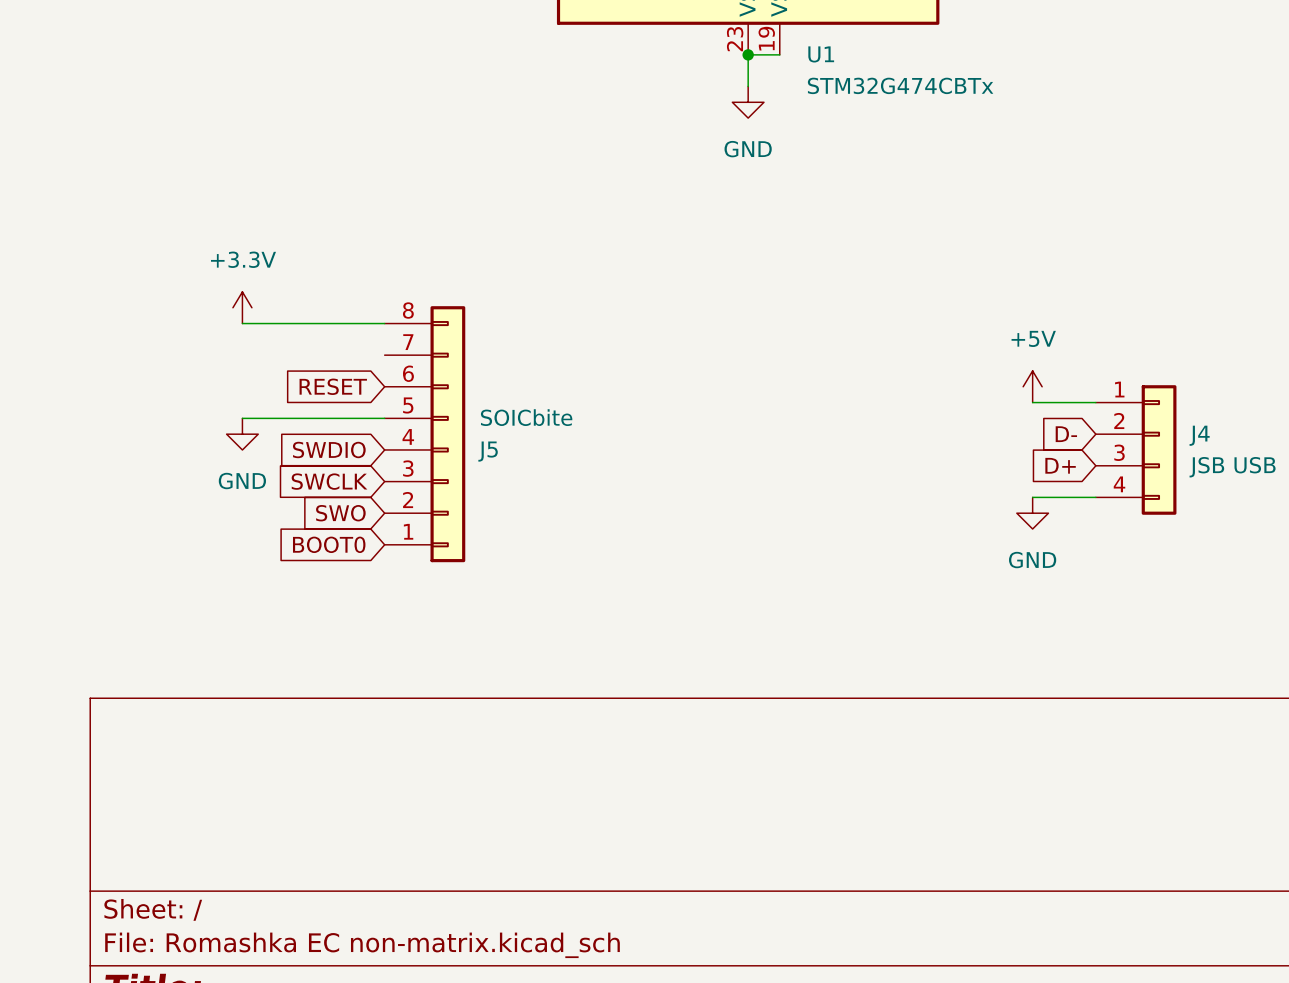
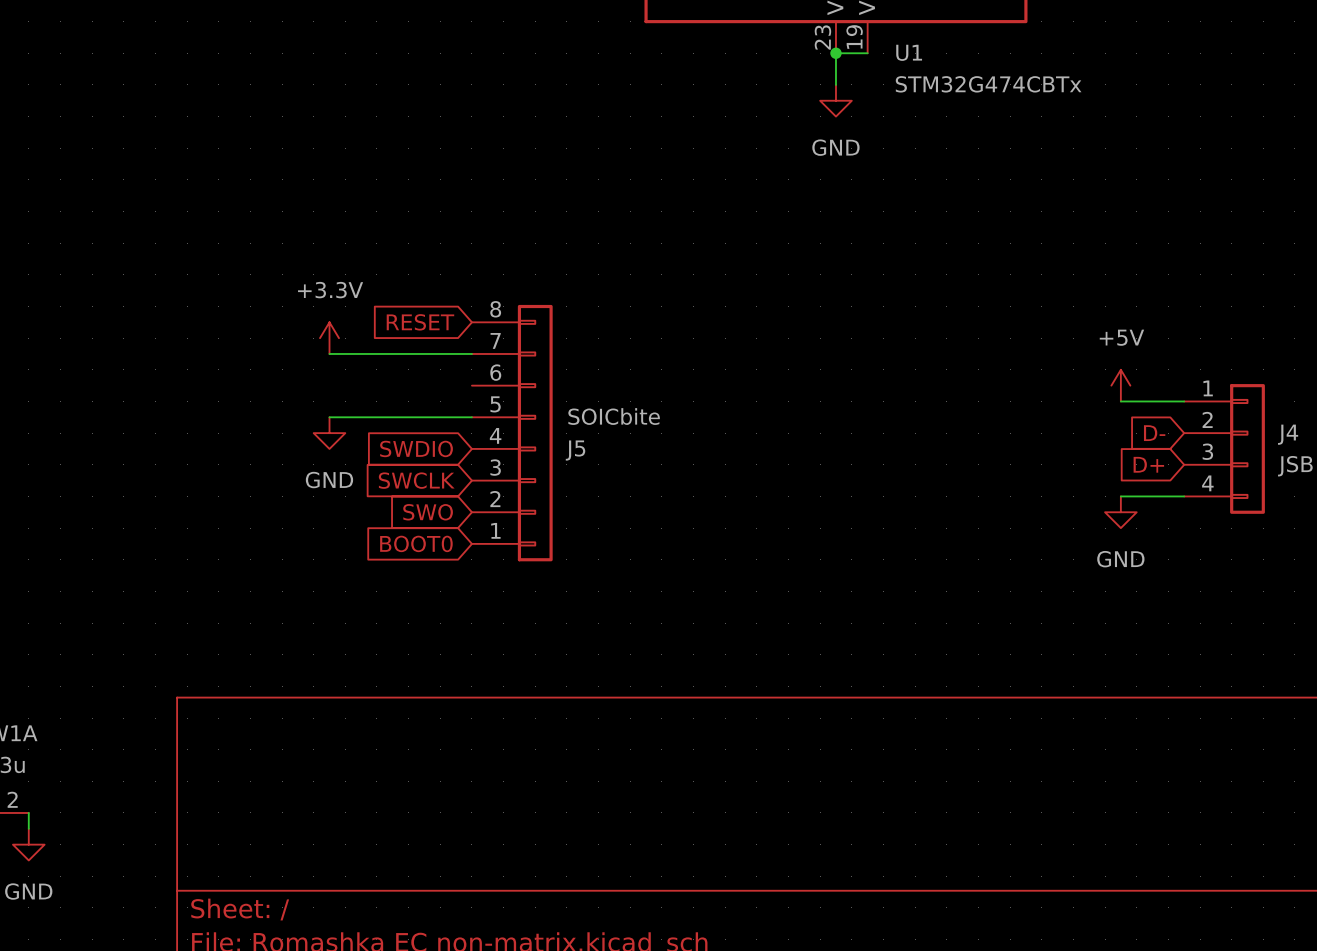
power symbol position: +3.3V (242, 307) -> +3.3V (329, 338)
wire: (242, 323) (384, 323) -> (329, 353) (471, 353)
global label position: RESET (333, 386) -> RESET (420, 322)

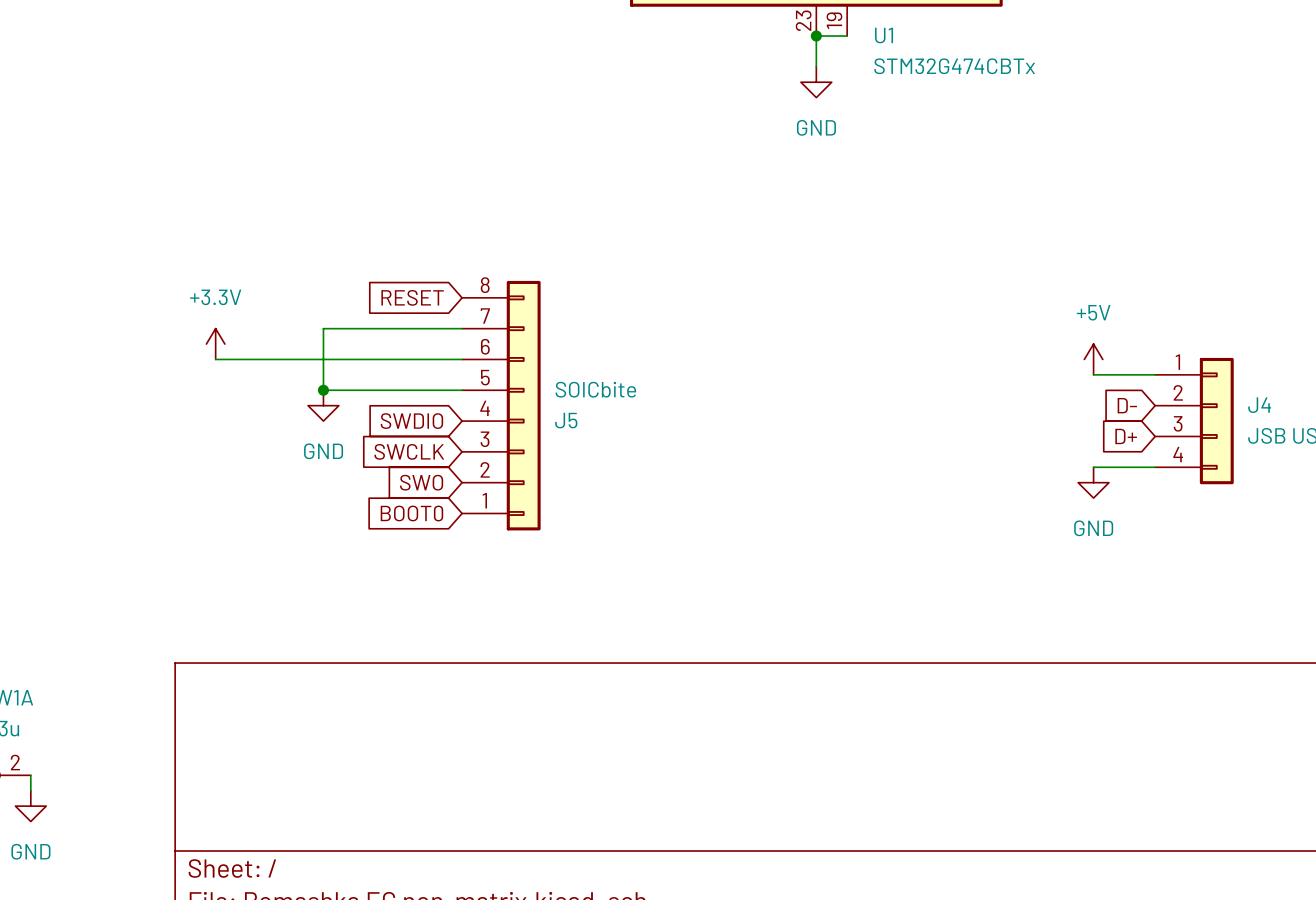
power symbol position: +3.3V (329, 338) -> +3.3V (215, 344)
wire: none -> (323, 328) (323, 390)
wire: none -> (215, 359) (462, 359)
junction: none -> (323, 390)

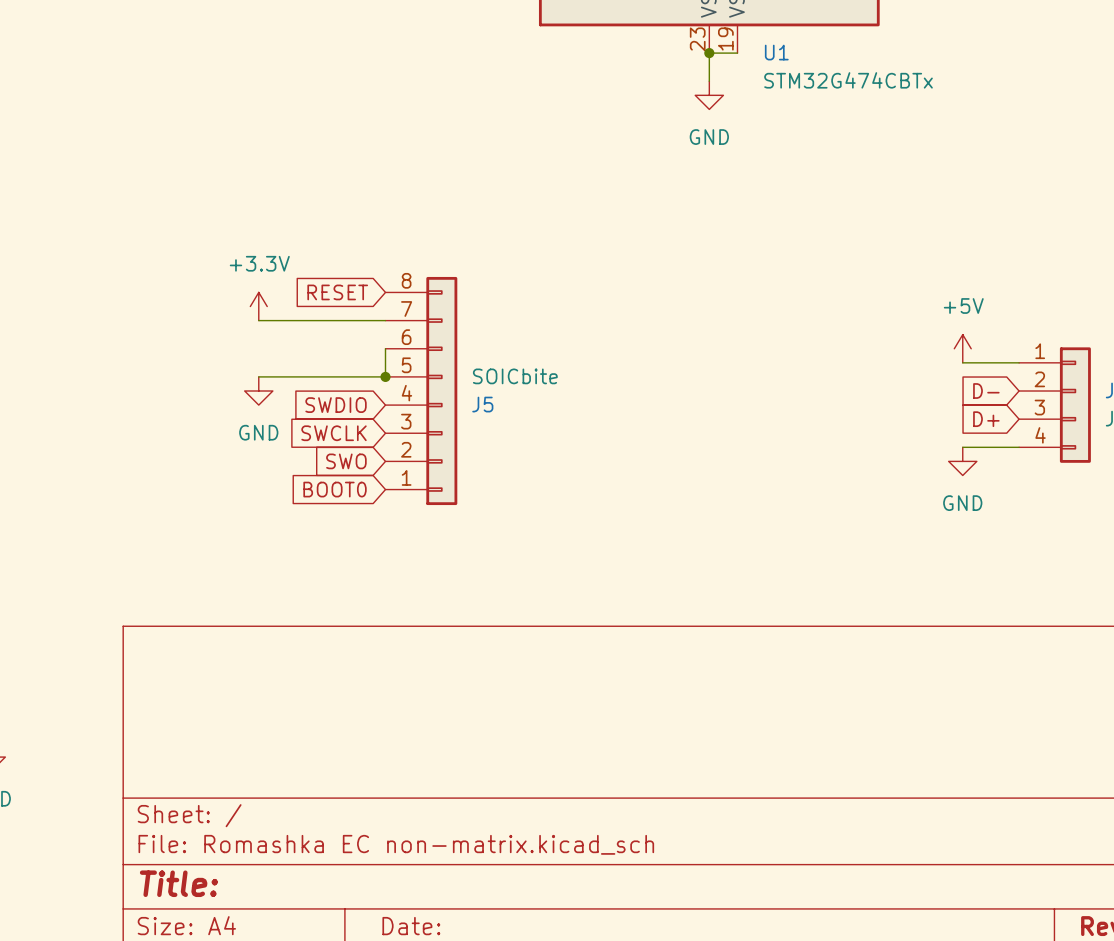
wire: (323, 328) (323, 390) -> none
power symbol position: +3.3V (215, 344) -> +3.3V (258, 306)
wire: (215, 359) (462, 359) -> (385, 376) (385, 348)
junction: (323, 390) -> none
junction: none -> (385, 376)

